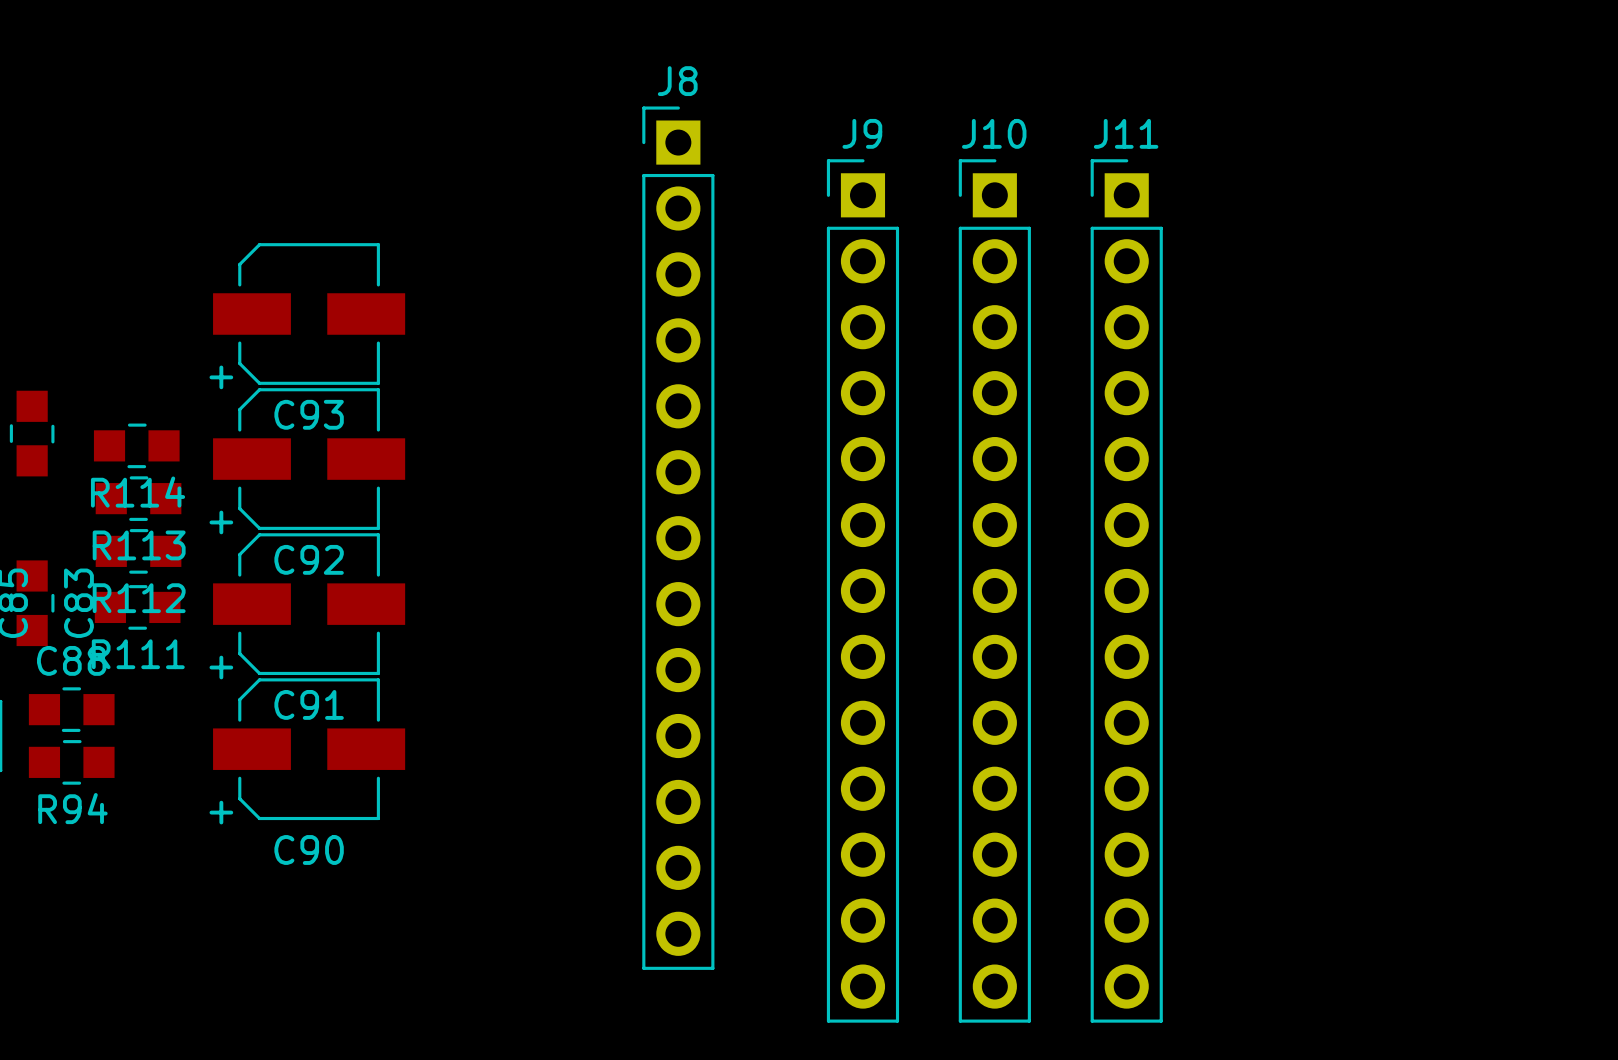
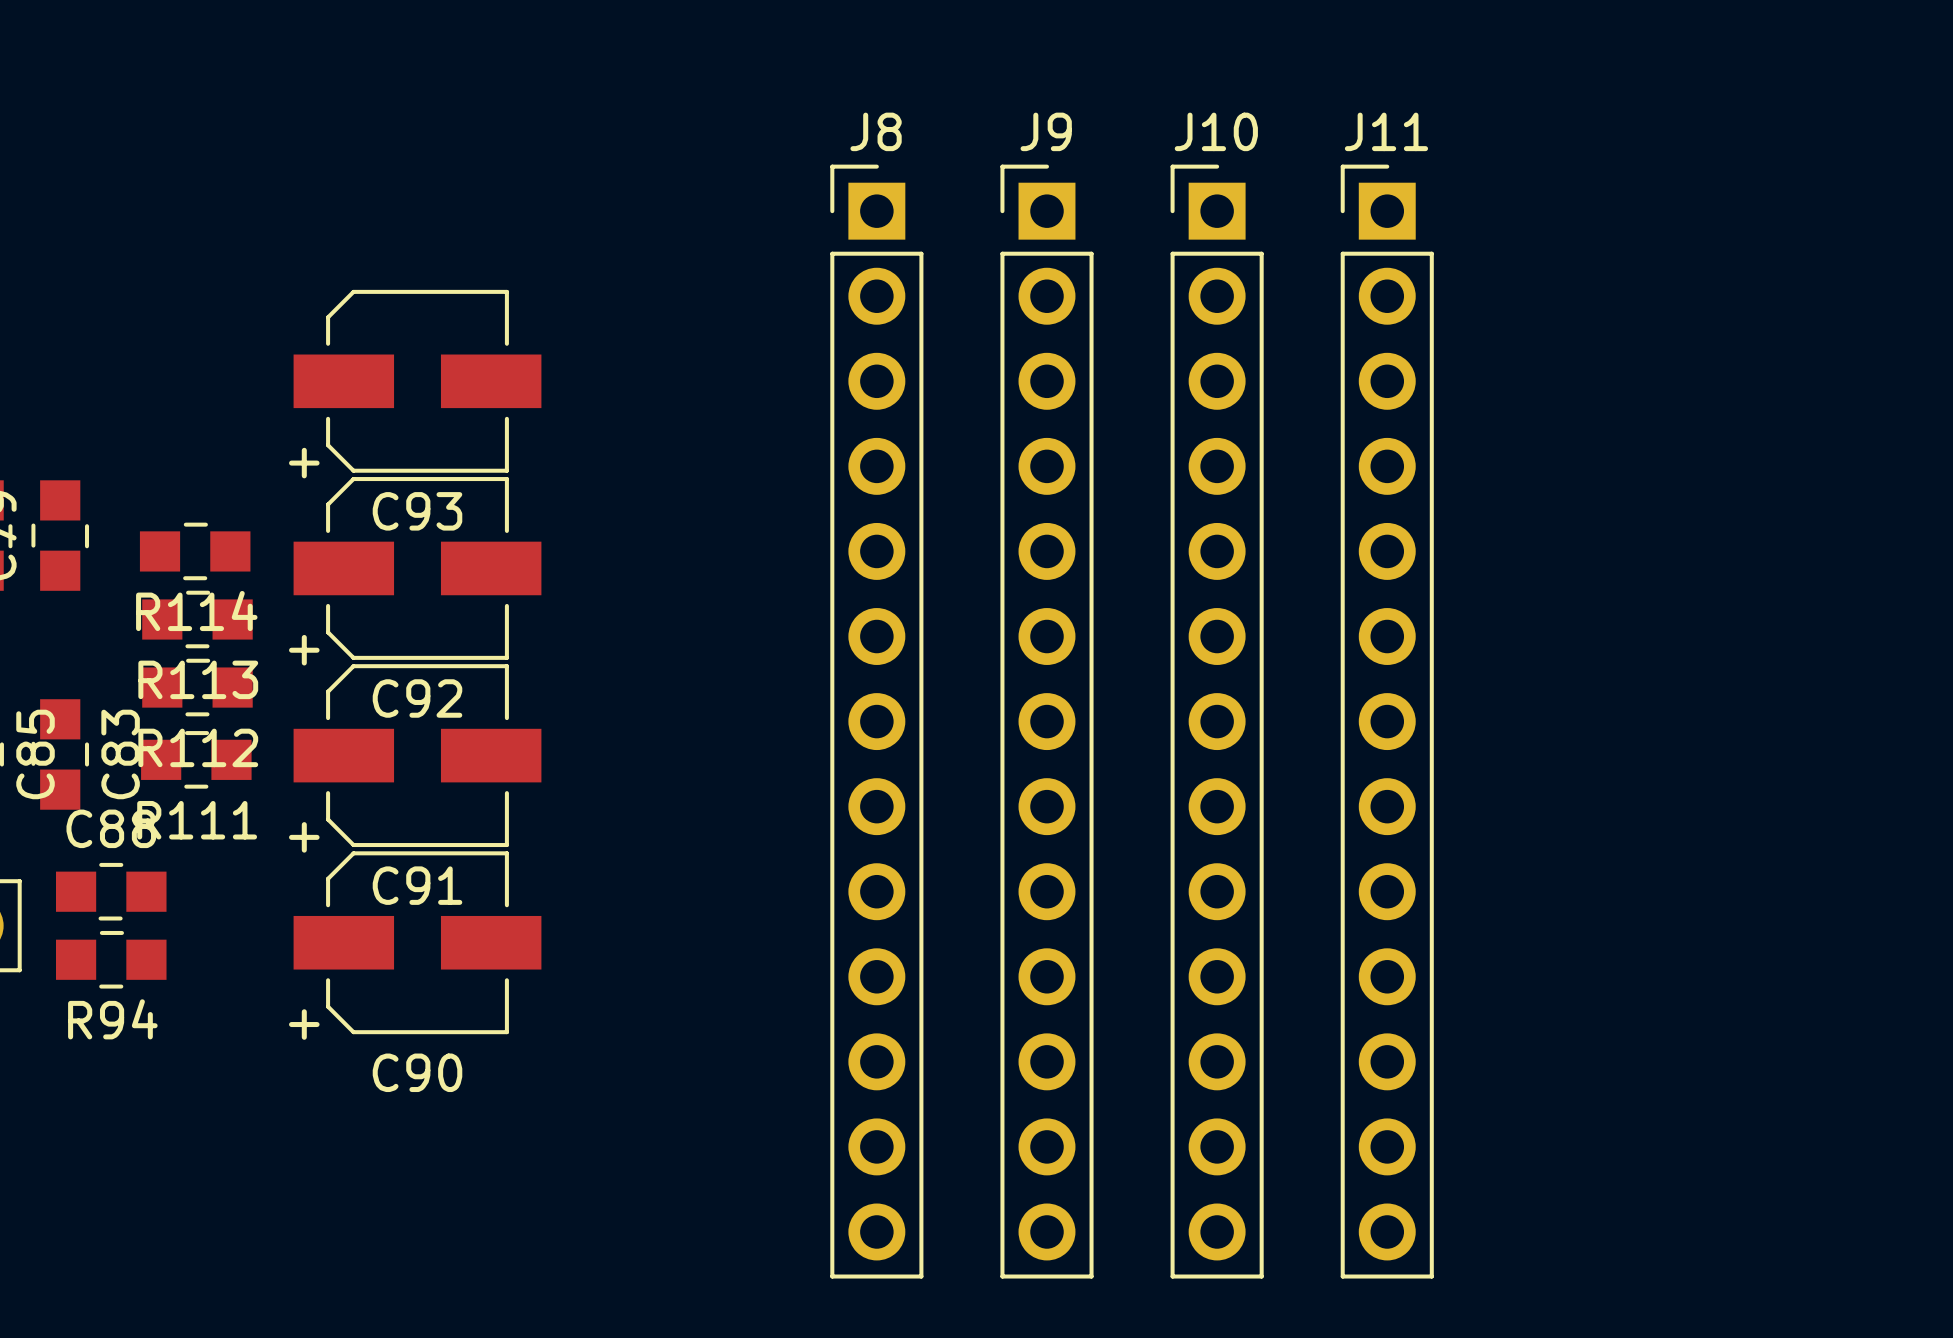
J8 position: (678, 538) -> (876, 721)
J9 position: (862, 590) -> (1046, 721)
J10 position: (994, 590) -> (1217, 721)
J11 position: (1126, 590) -> (1387, 721)

